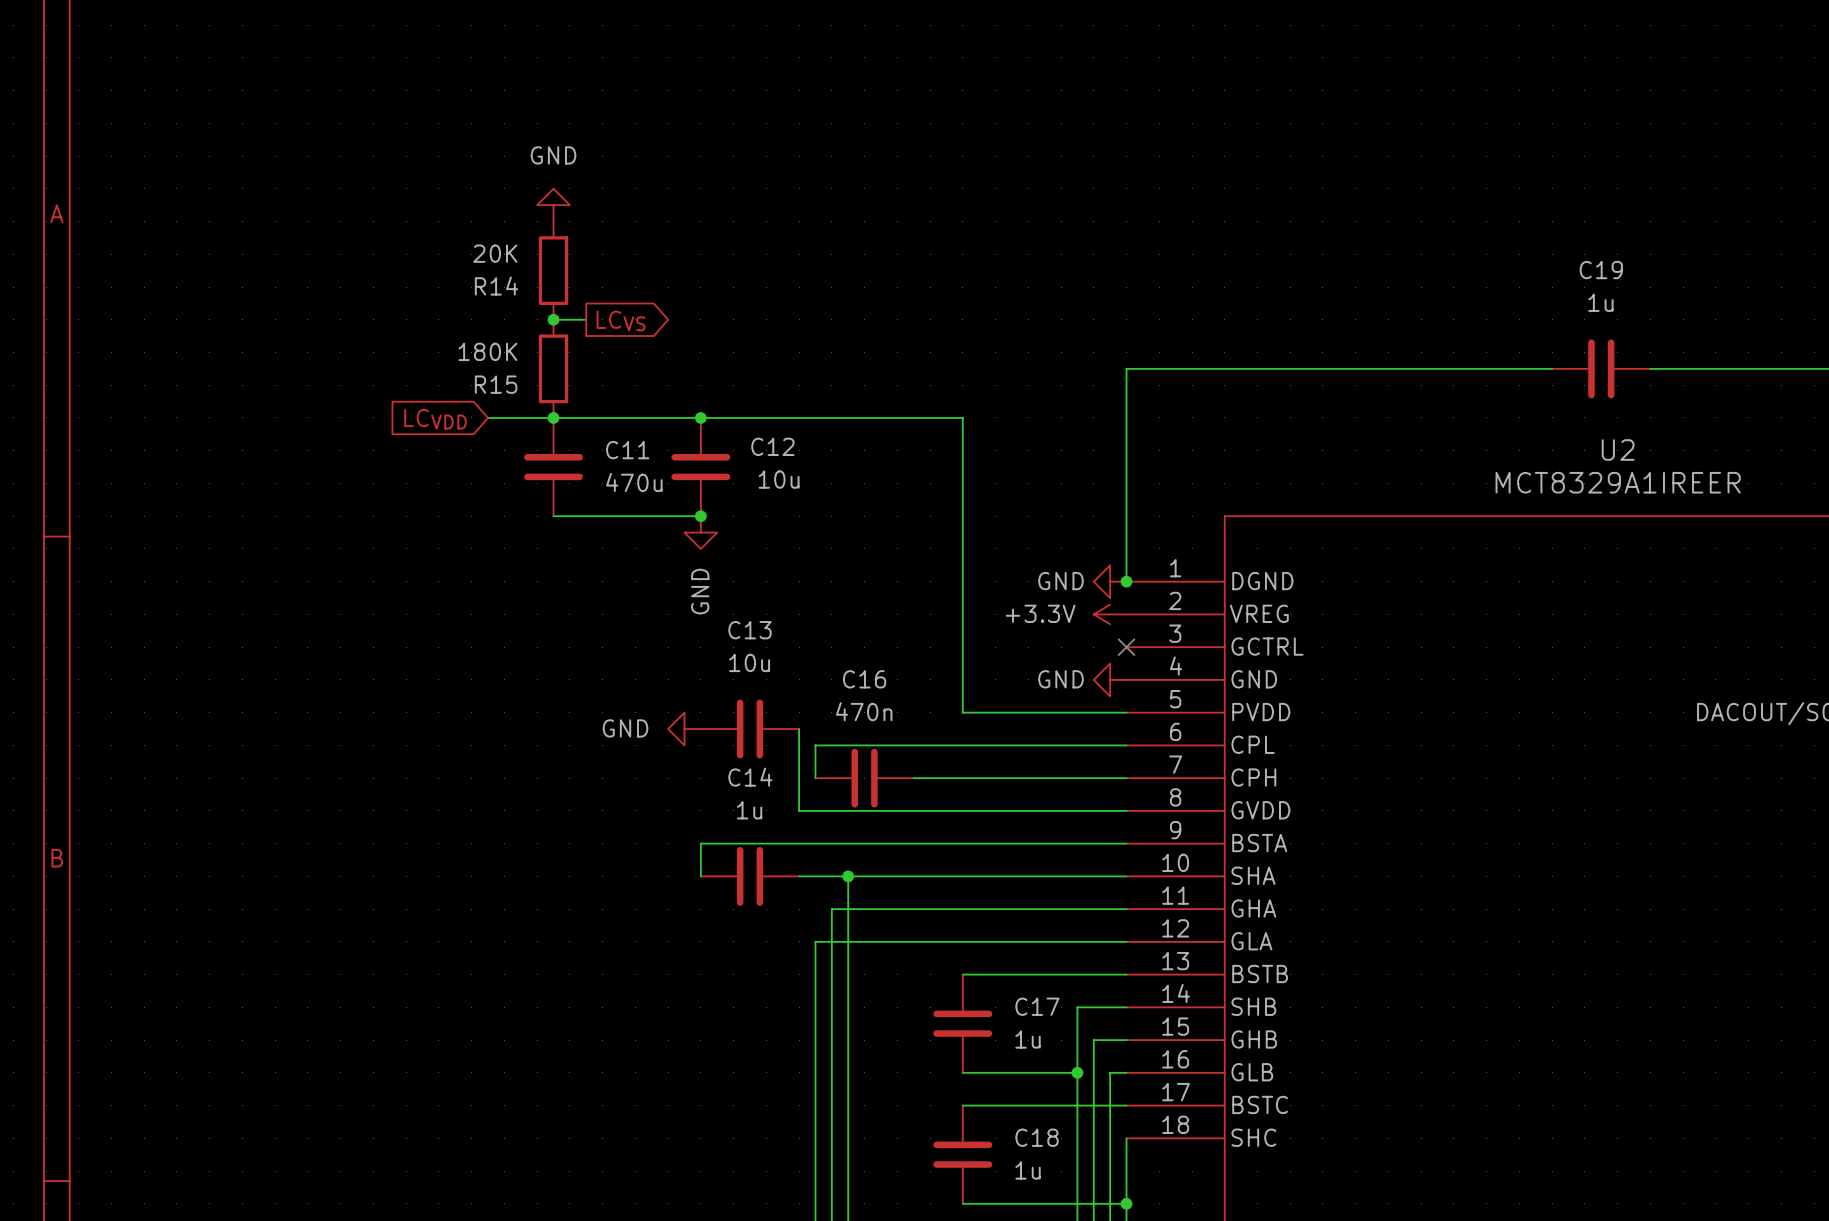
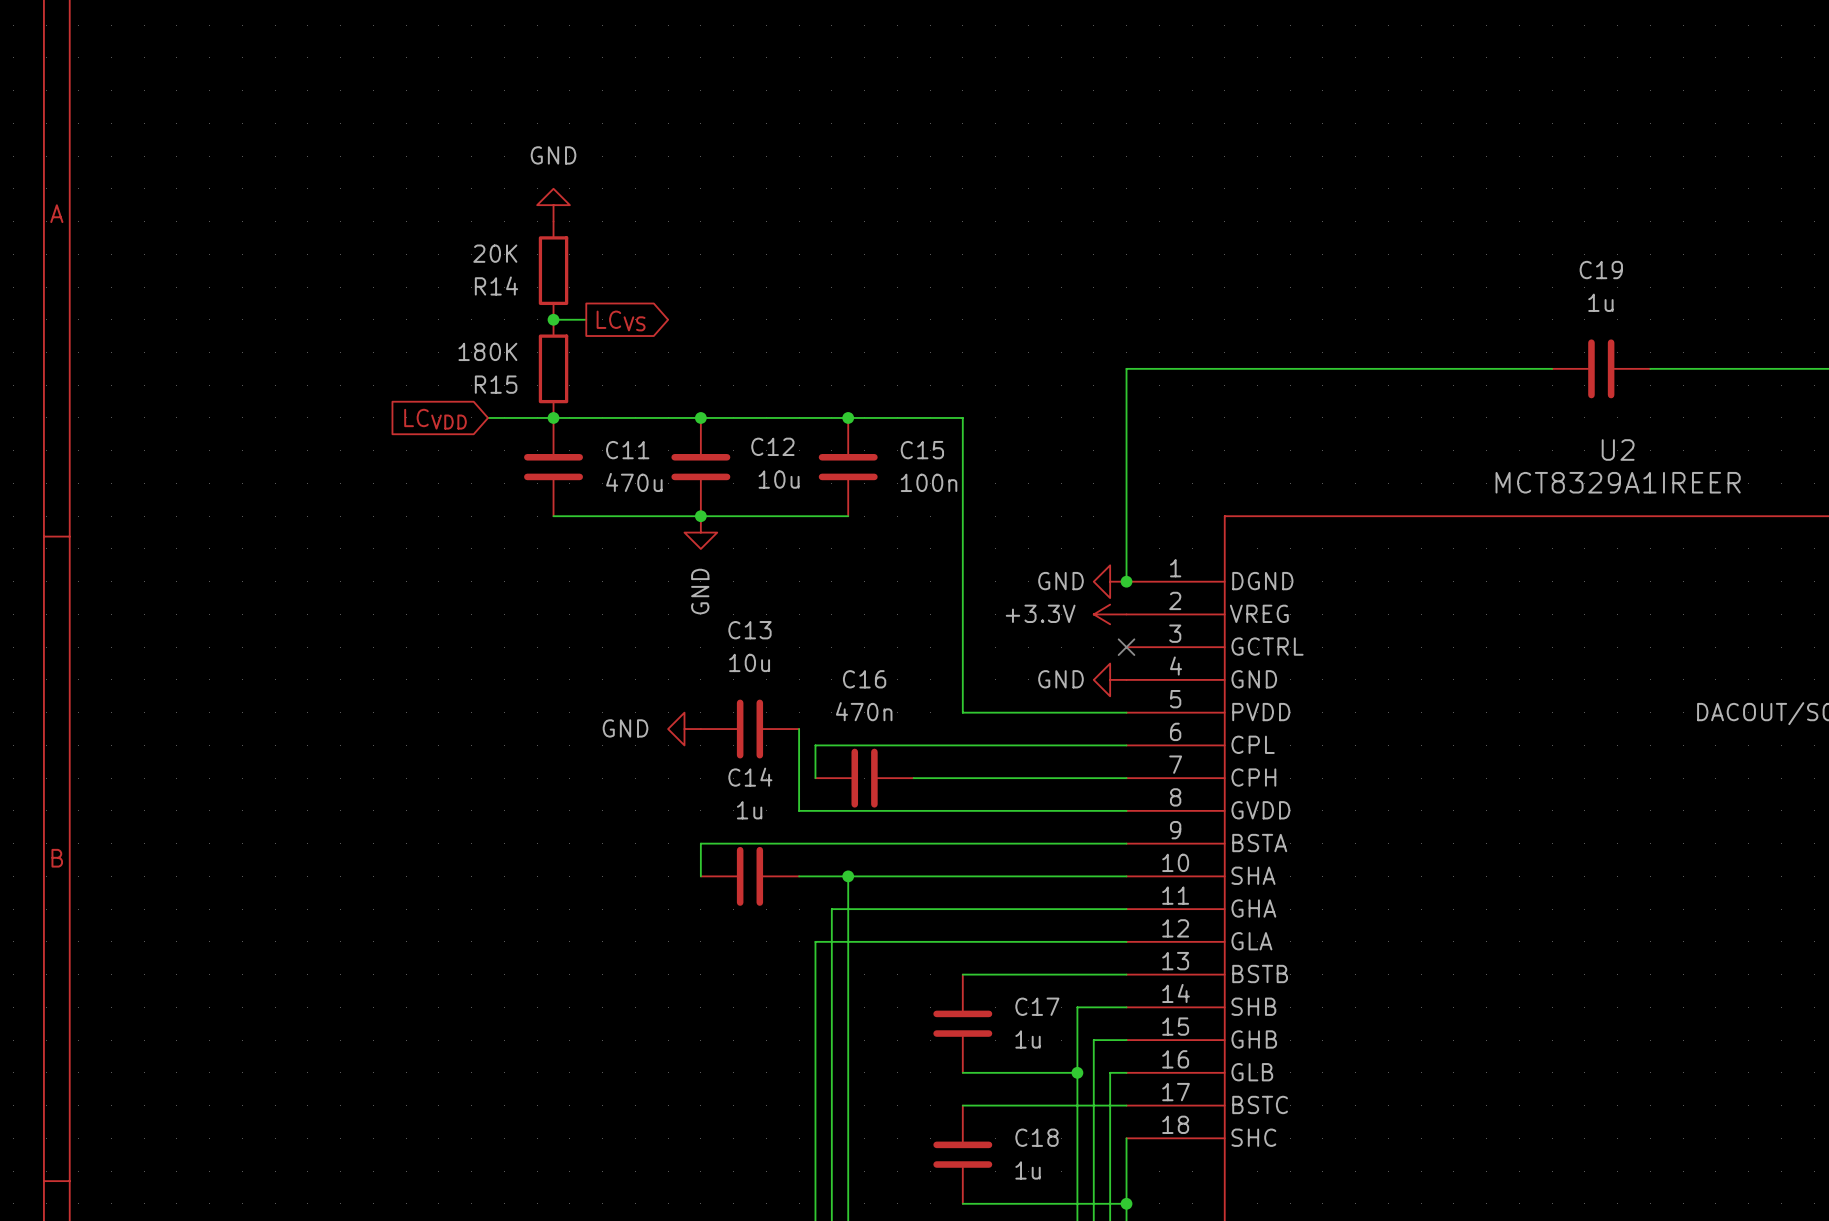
junction: none -> (848, 417)
C15: none -> 100n (848, 467)
wire: none -> (700, 516) (848, 516)

